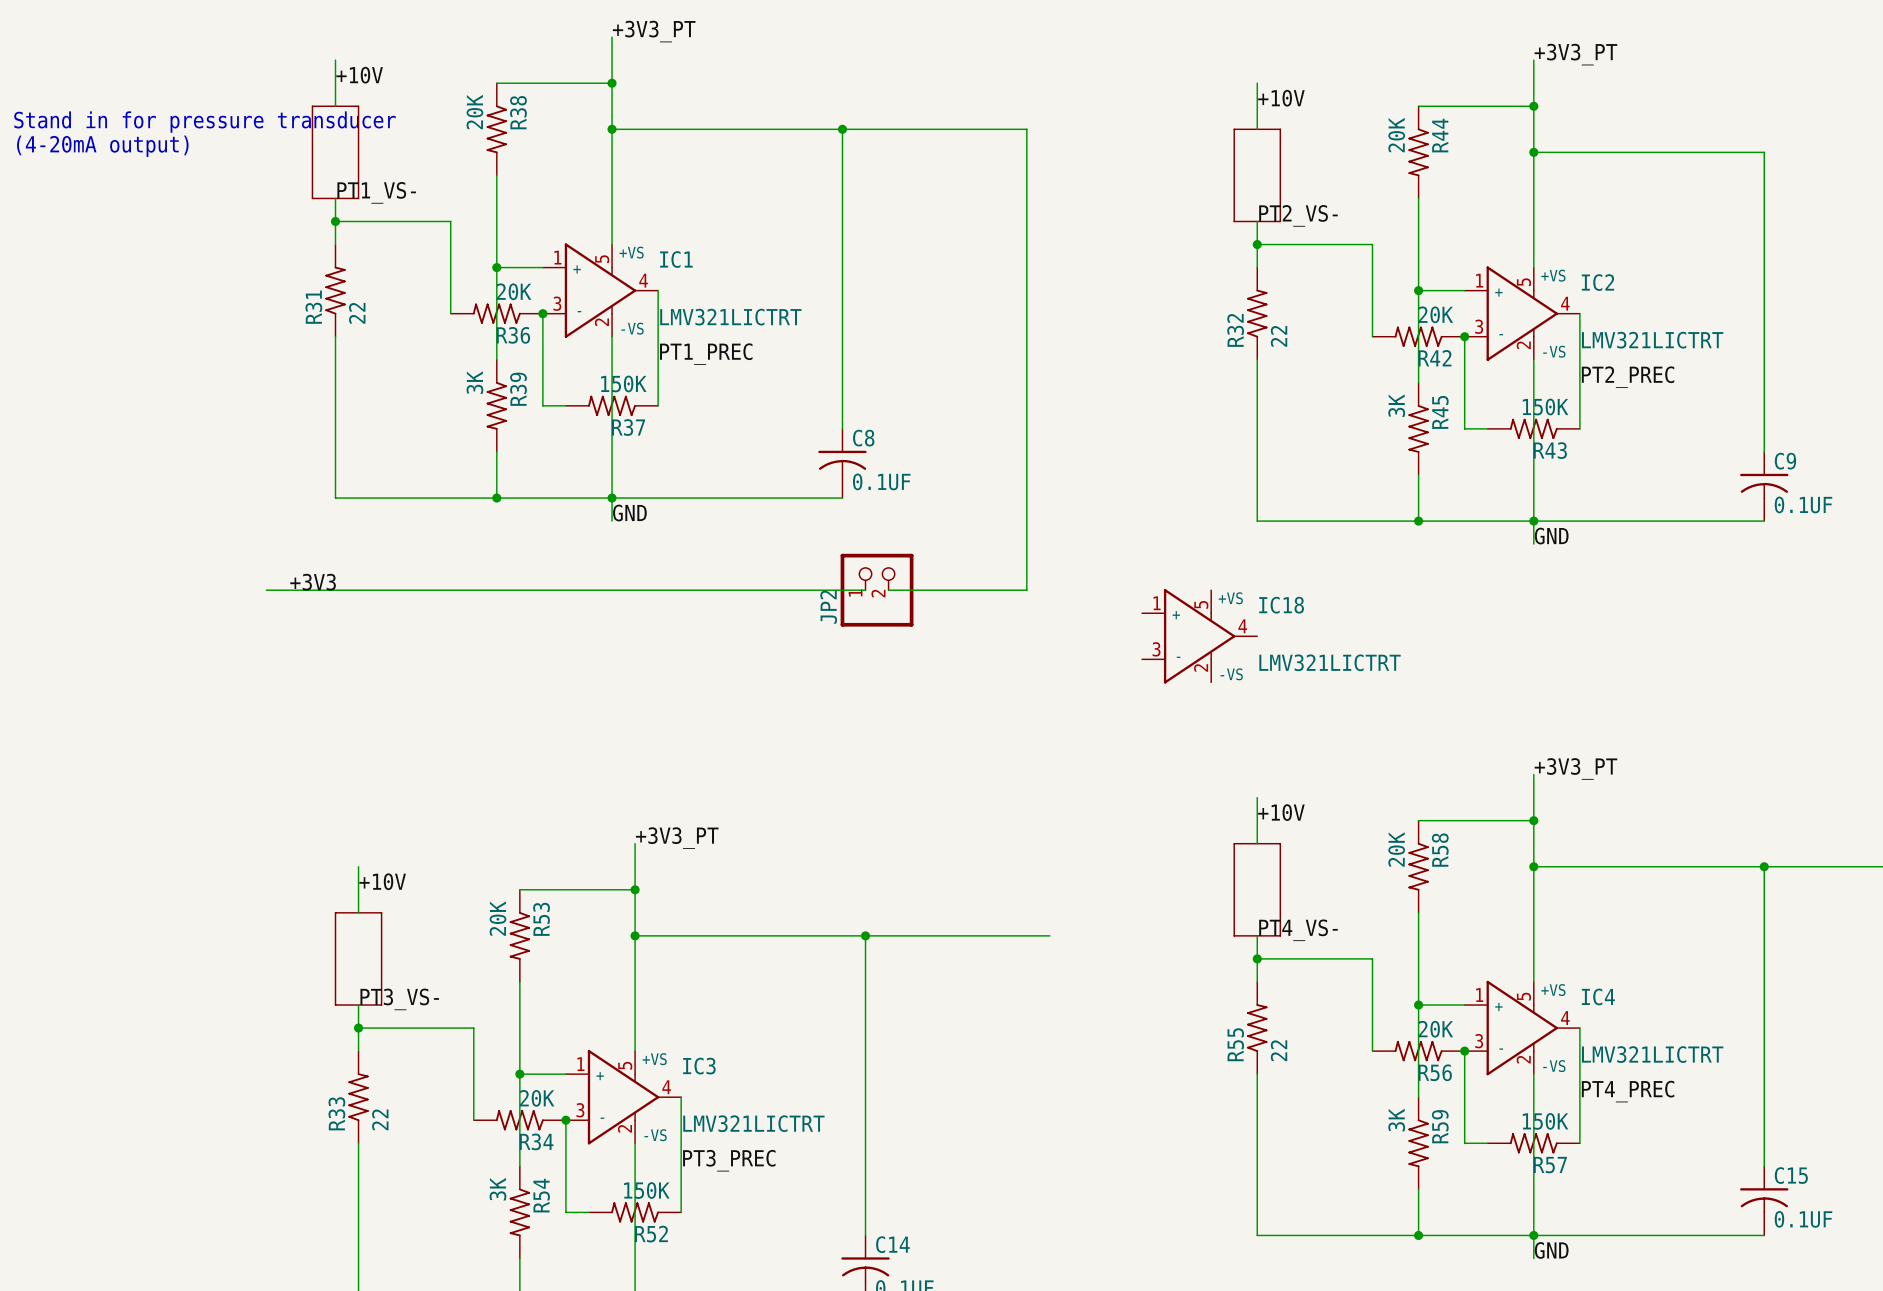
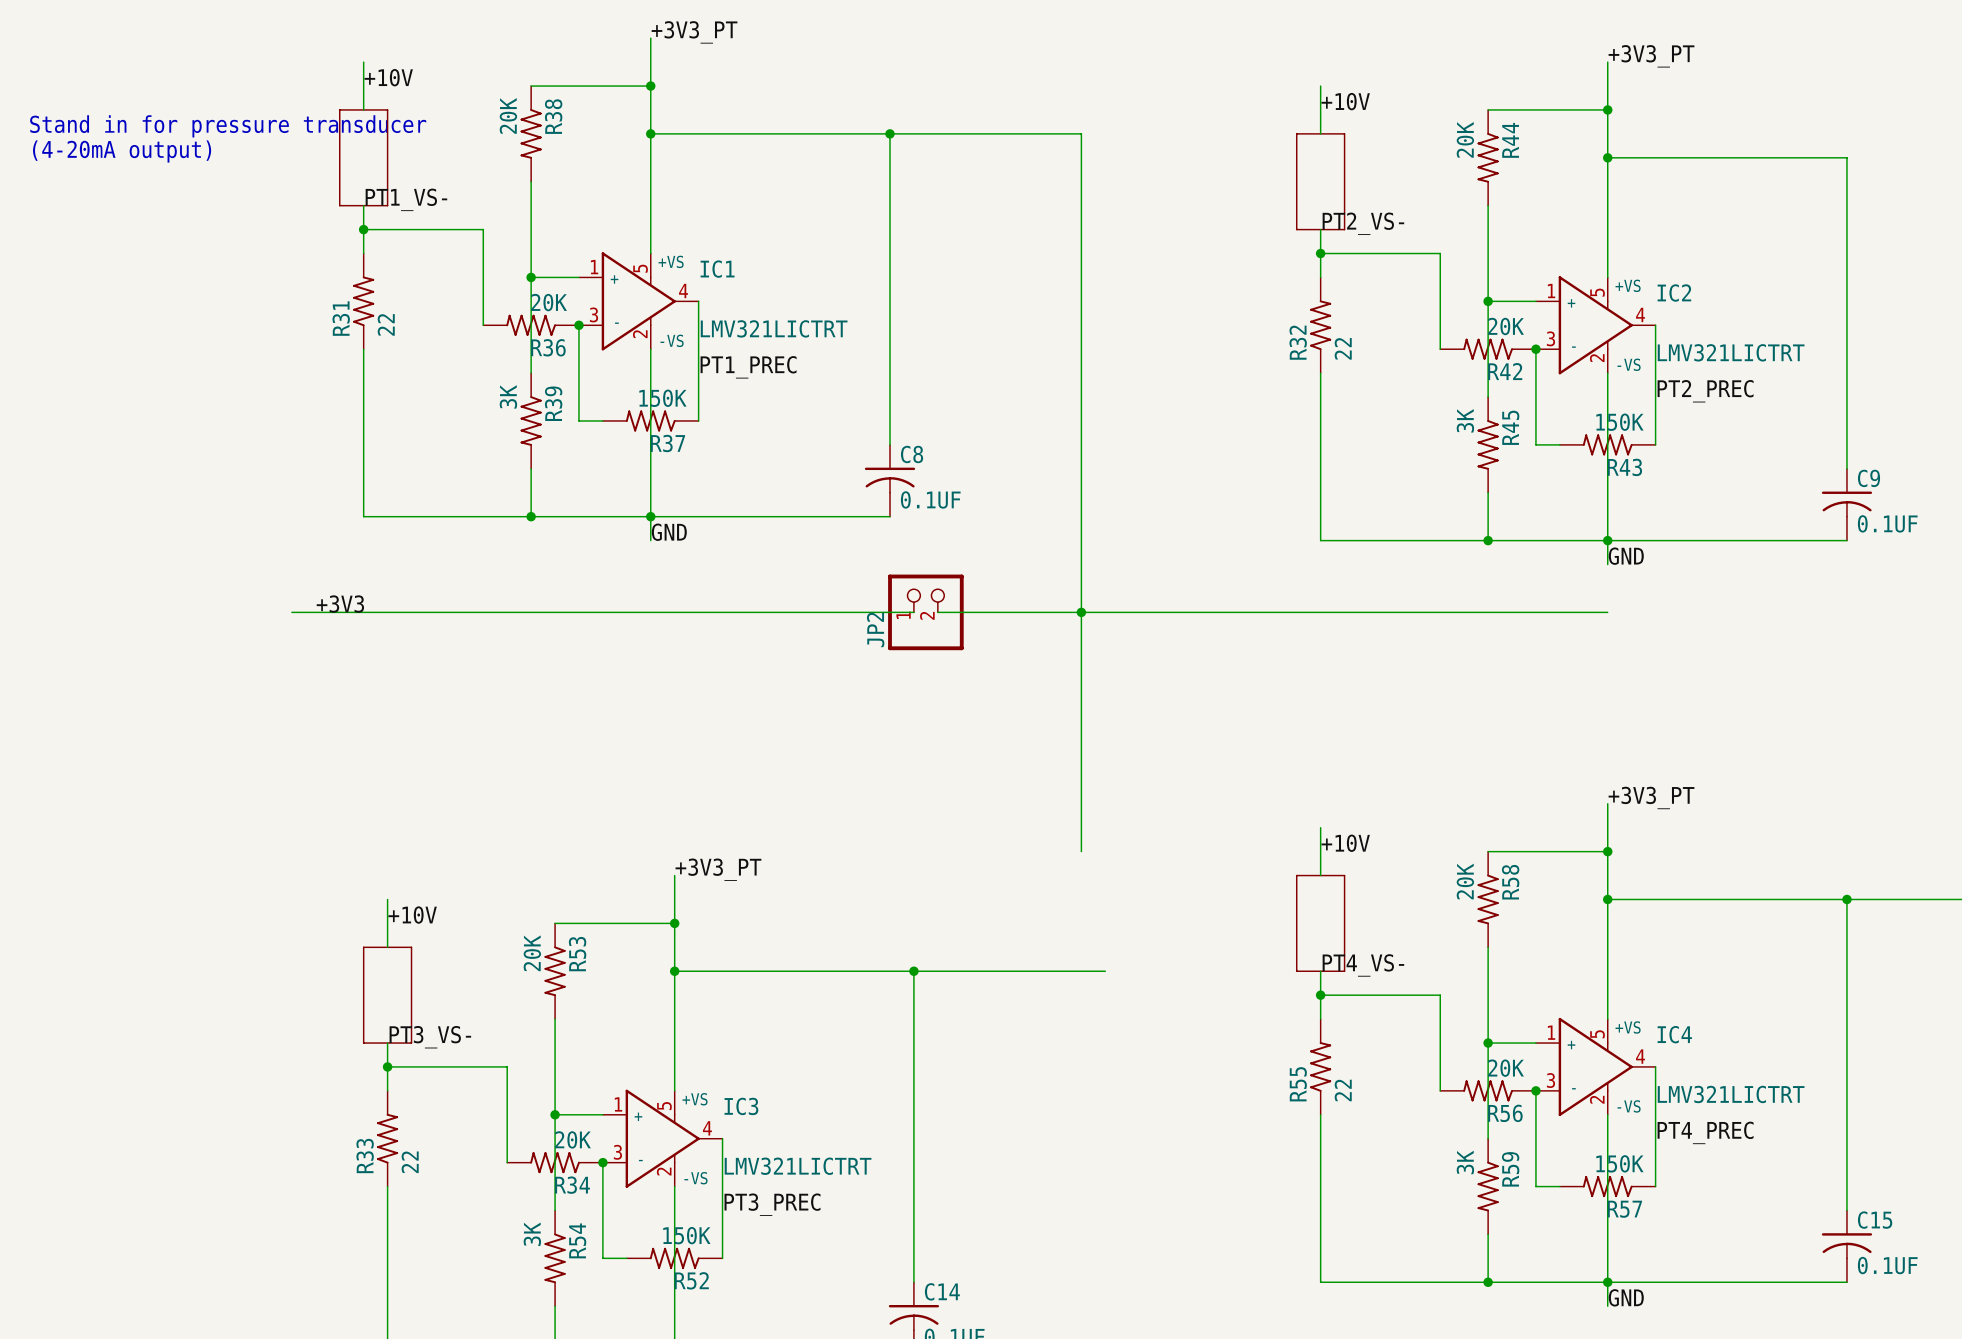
junction: none -> (1081, 612)
wire: none -> (1607, 612) (1081, 612) (1081, 851)
IC18: LMV321LICTRT (1199, 636) -> none

